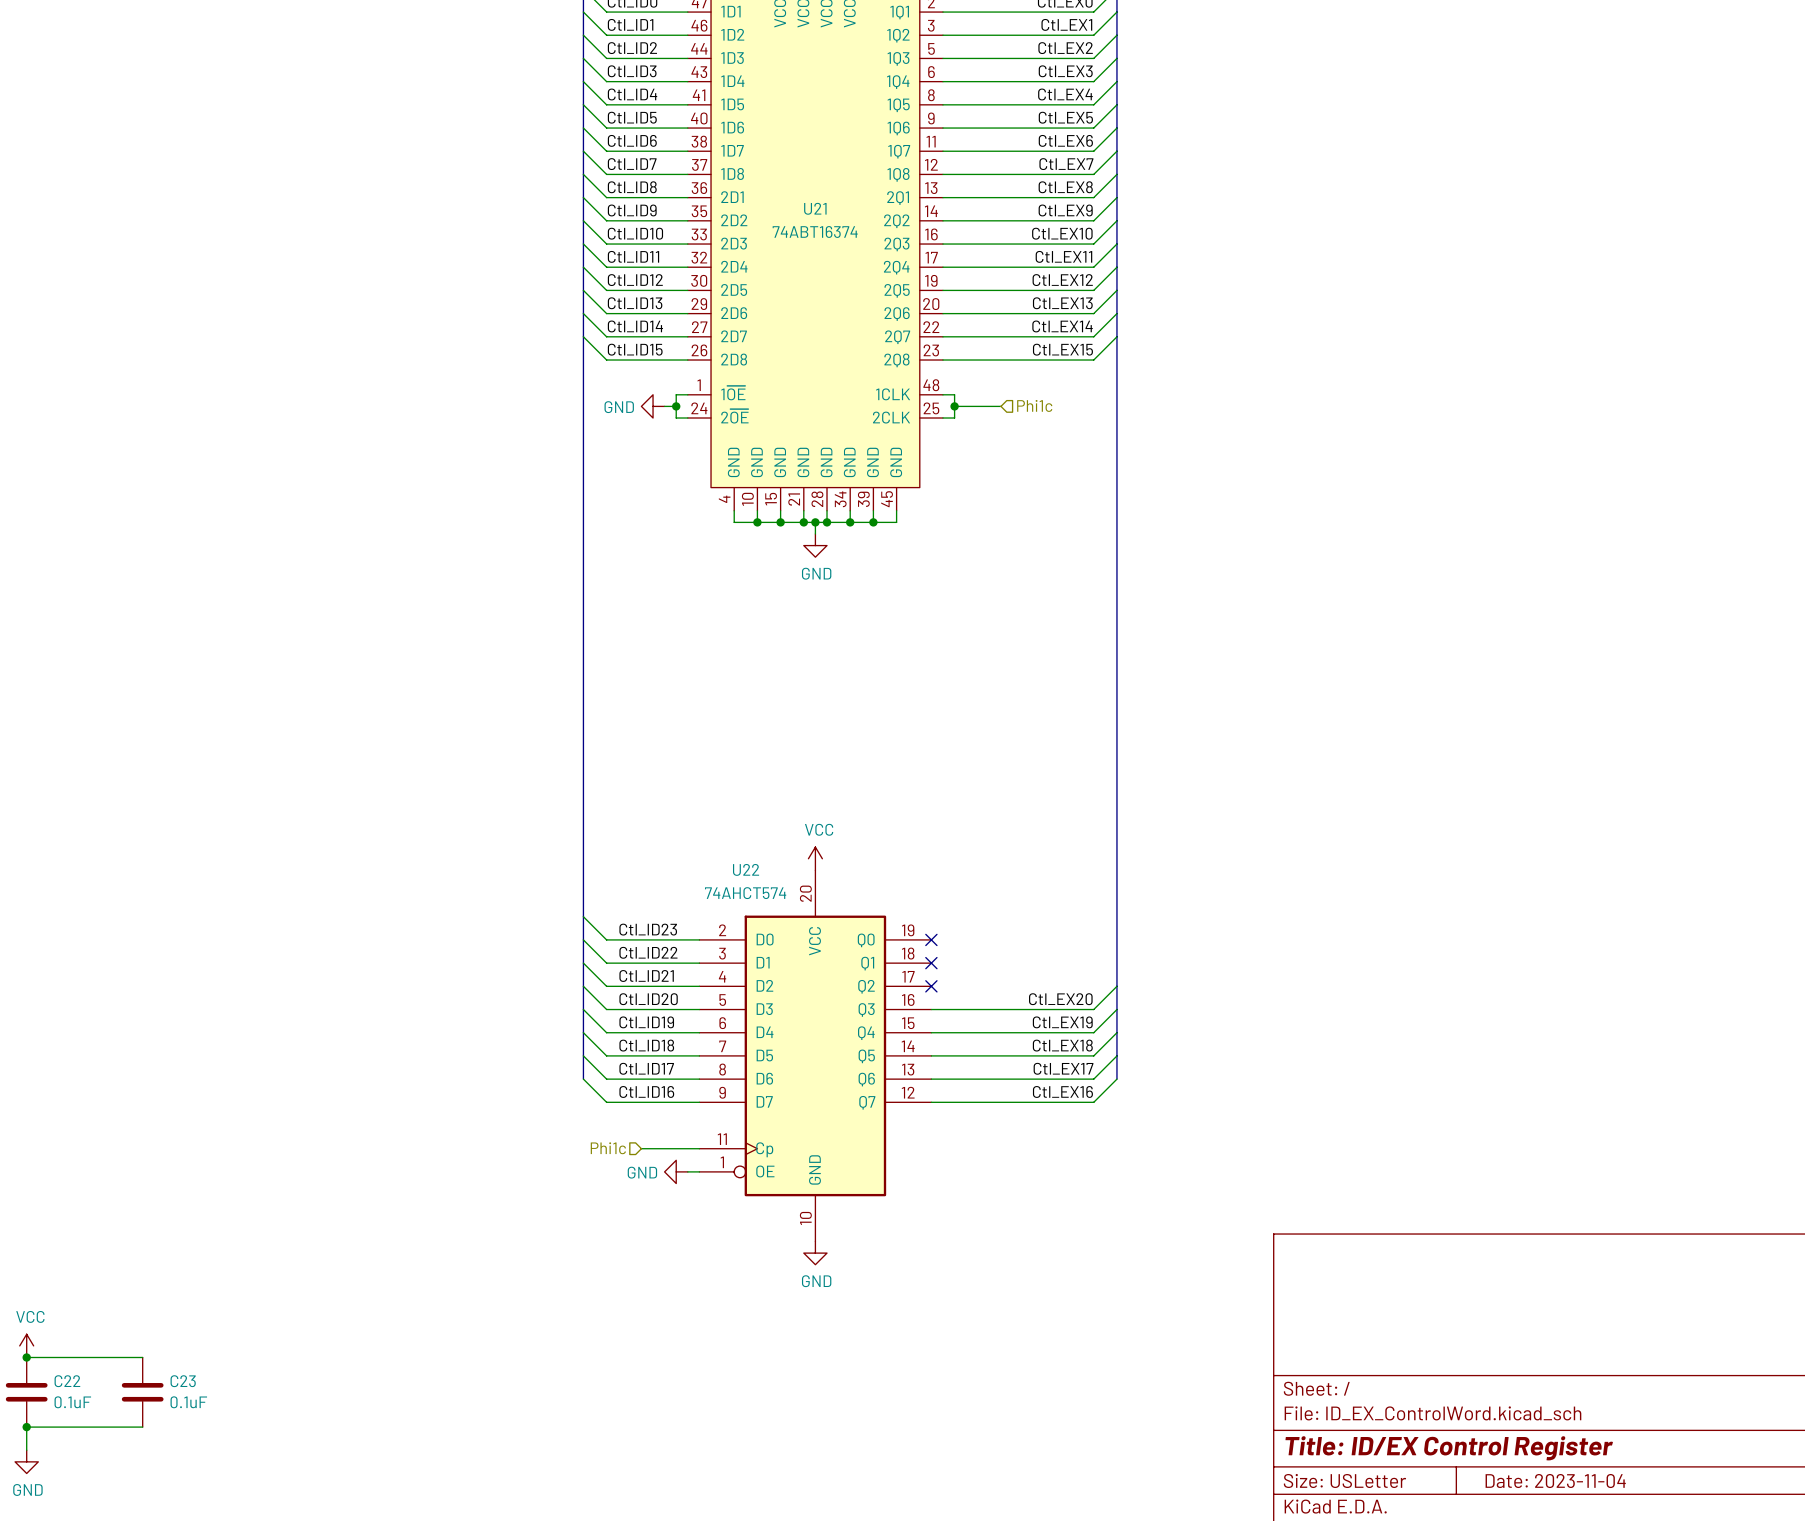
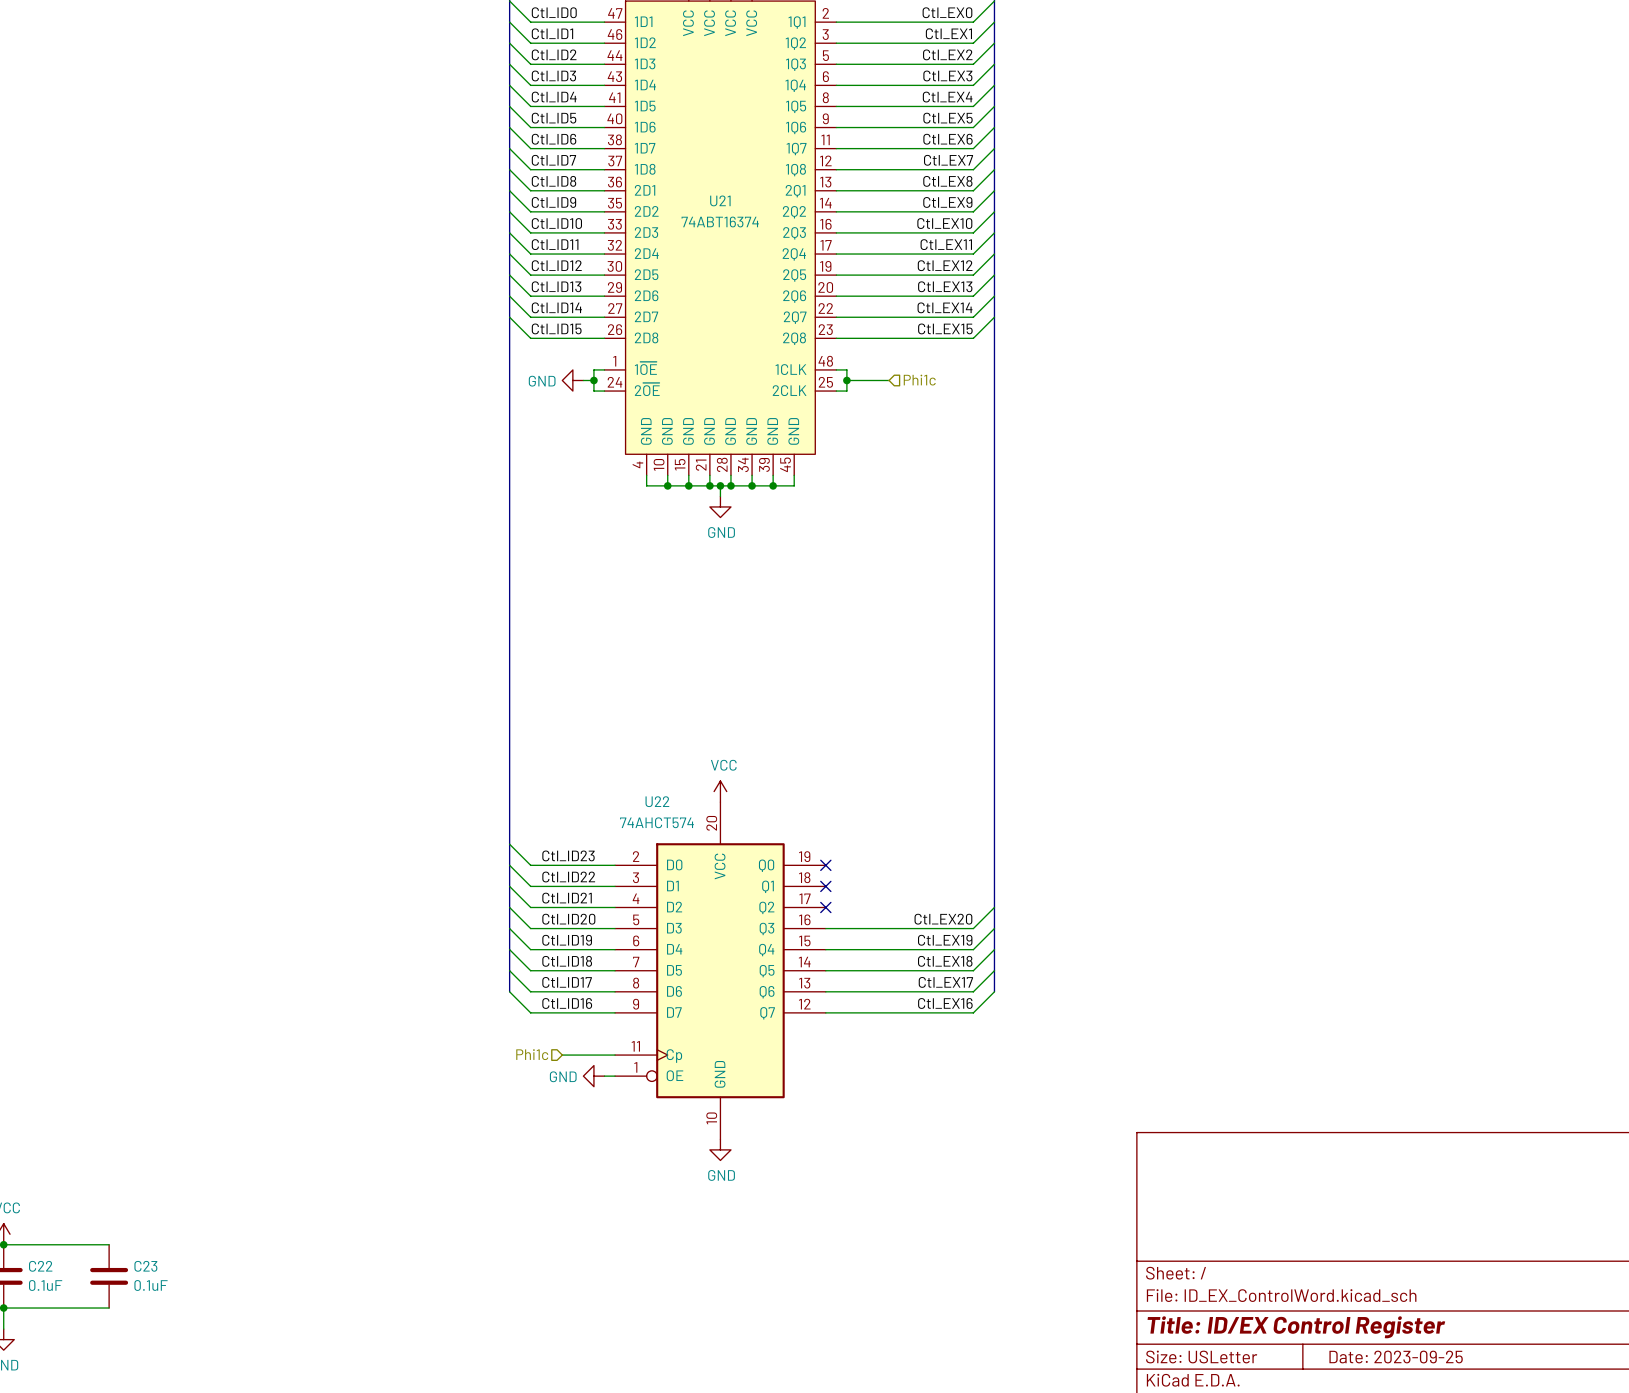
title block: Date: 2023-11-04 (1555, 1481) -> Date: 2023-09-25 (1396, 1357)

